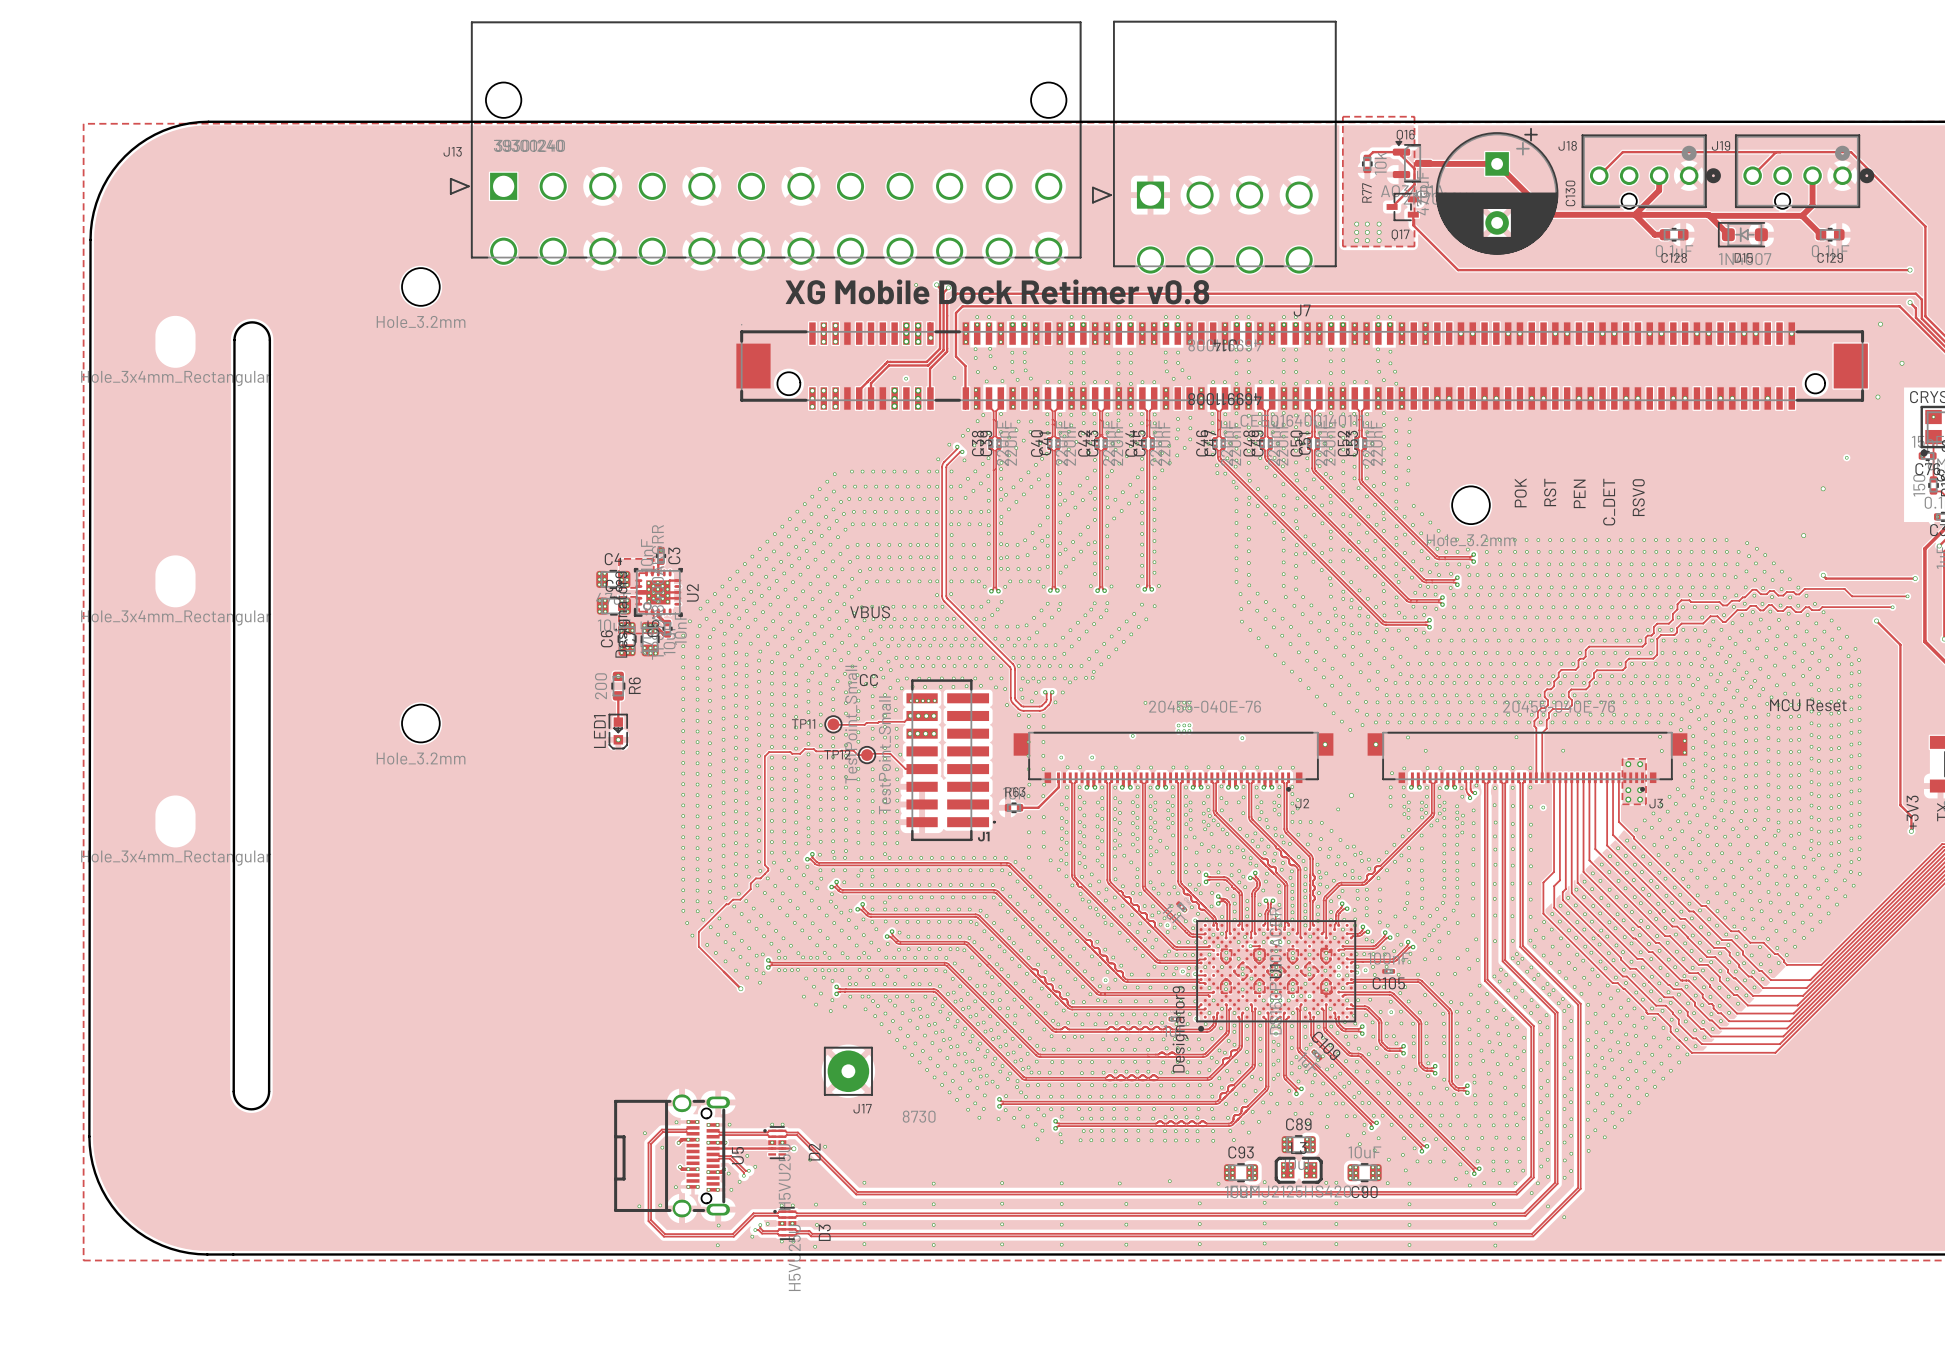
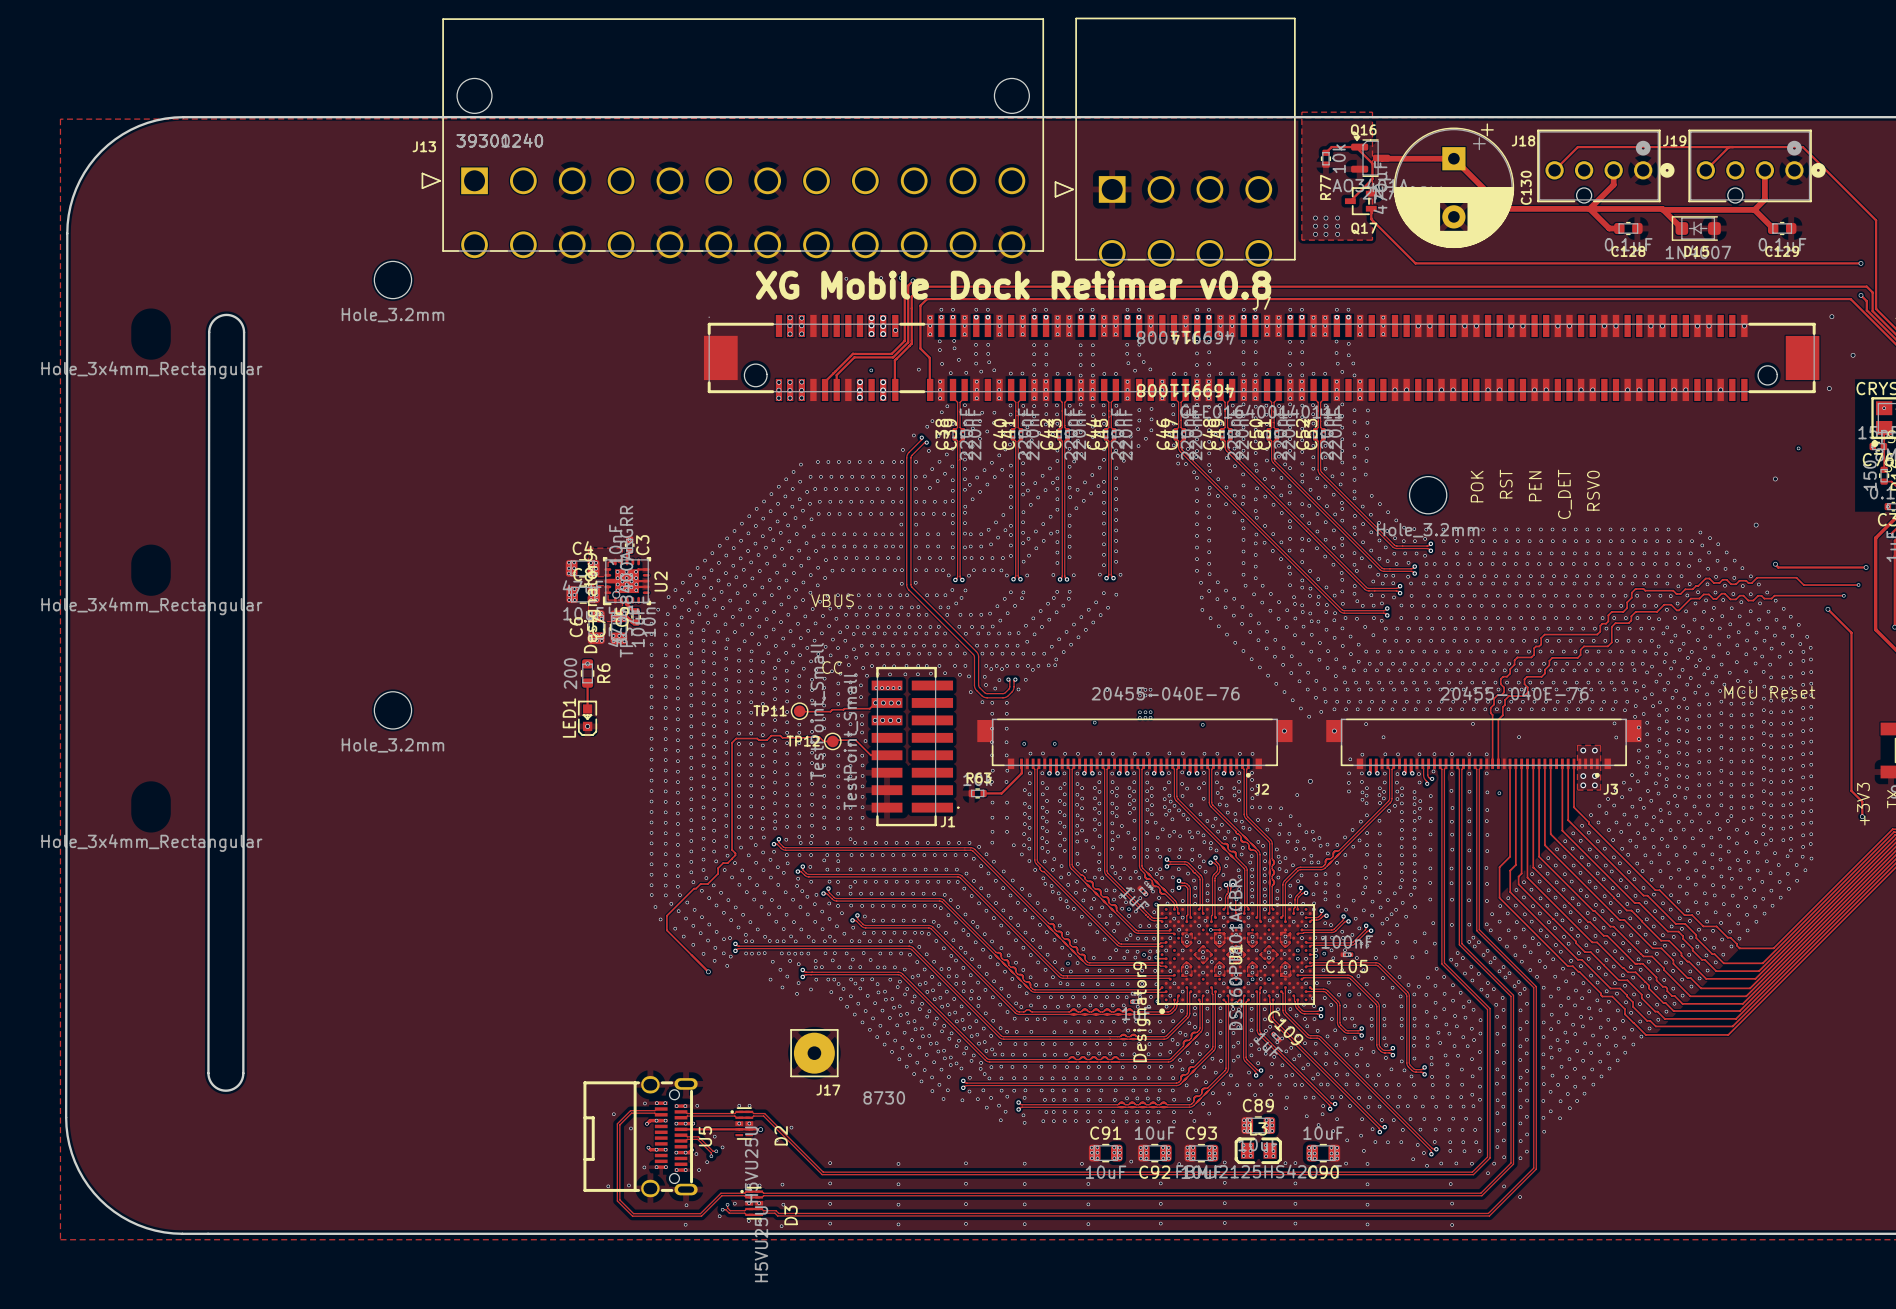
via: none -> (1091, 1147)
via: none -> (1097, 1147)
via: none -> (1114, 1147)
via: none -> (1119, 1147)
via: none -> (1140, 1147)
via: none -> (1146, 1147)
via: none -> (1163, 1147)
via: none -> (1168, 1147)
via: none -> (1091, 1152)
via: none -> (1097, 1152)
C91: none -> 10uF (1105, 1153)
via: none -> (1114, 1152)
via: none -> (1119, 1152)
via: none -> (1140, 1152)
via: none -> (1146, 1152)
C92: none -> 10uF (1154, 1153)
via: none -> (1163, 1152)
via: none -> (1168, 1152)
via: none -> (1091, 1158)
via: none -> (1097, 1158)
via: none -> (1114, 1158)
via: none -> (1119, 1158)
via: none -> (1140, 1158)
via: none -> (1146, 1158)
via: none -> (1163, 1158)
via: none -> (1168, 1158)

